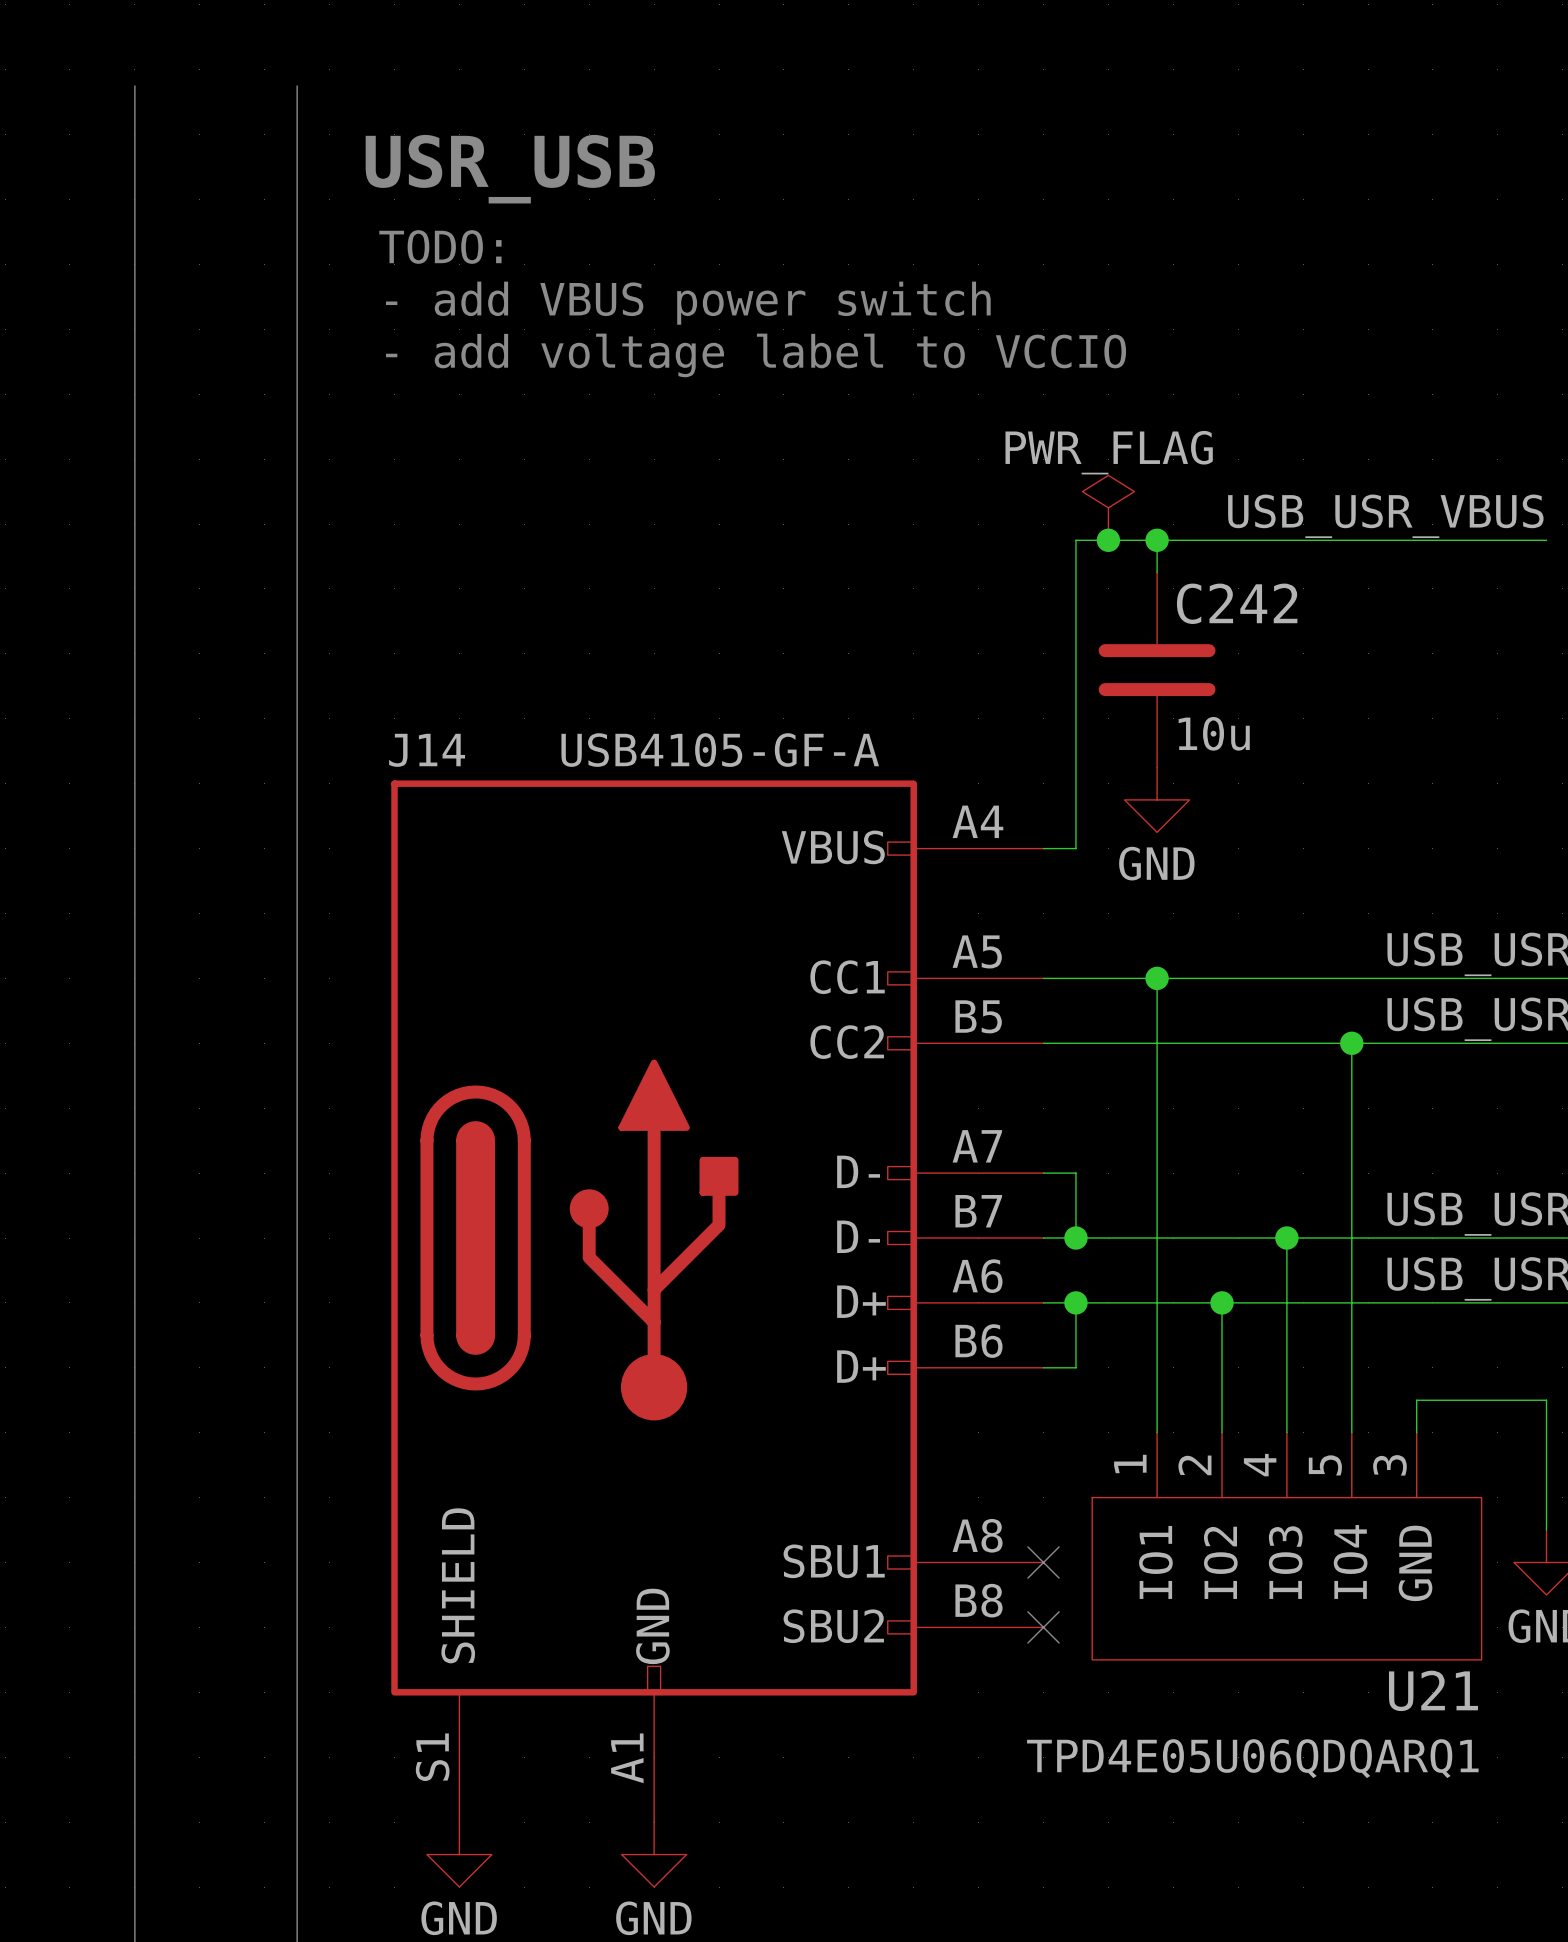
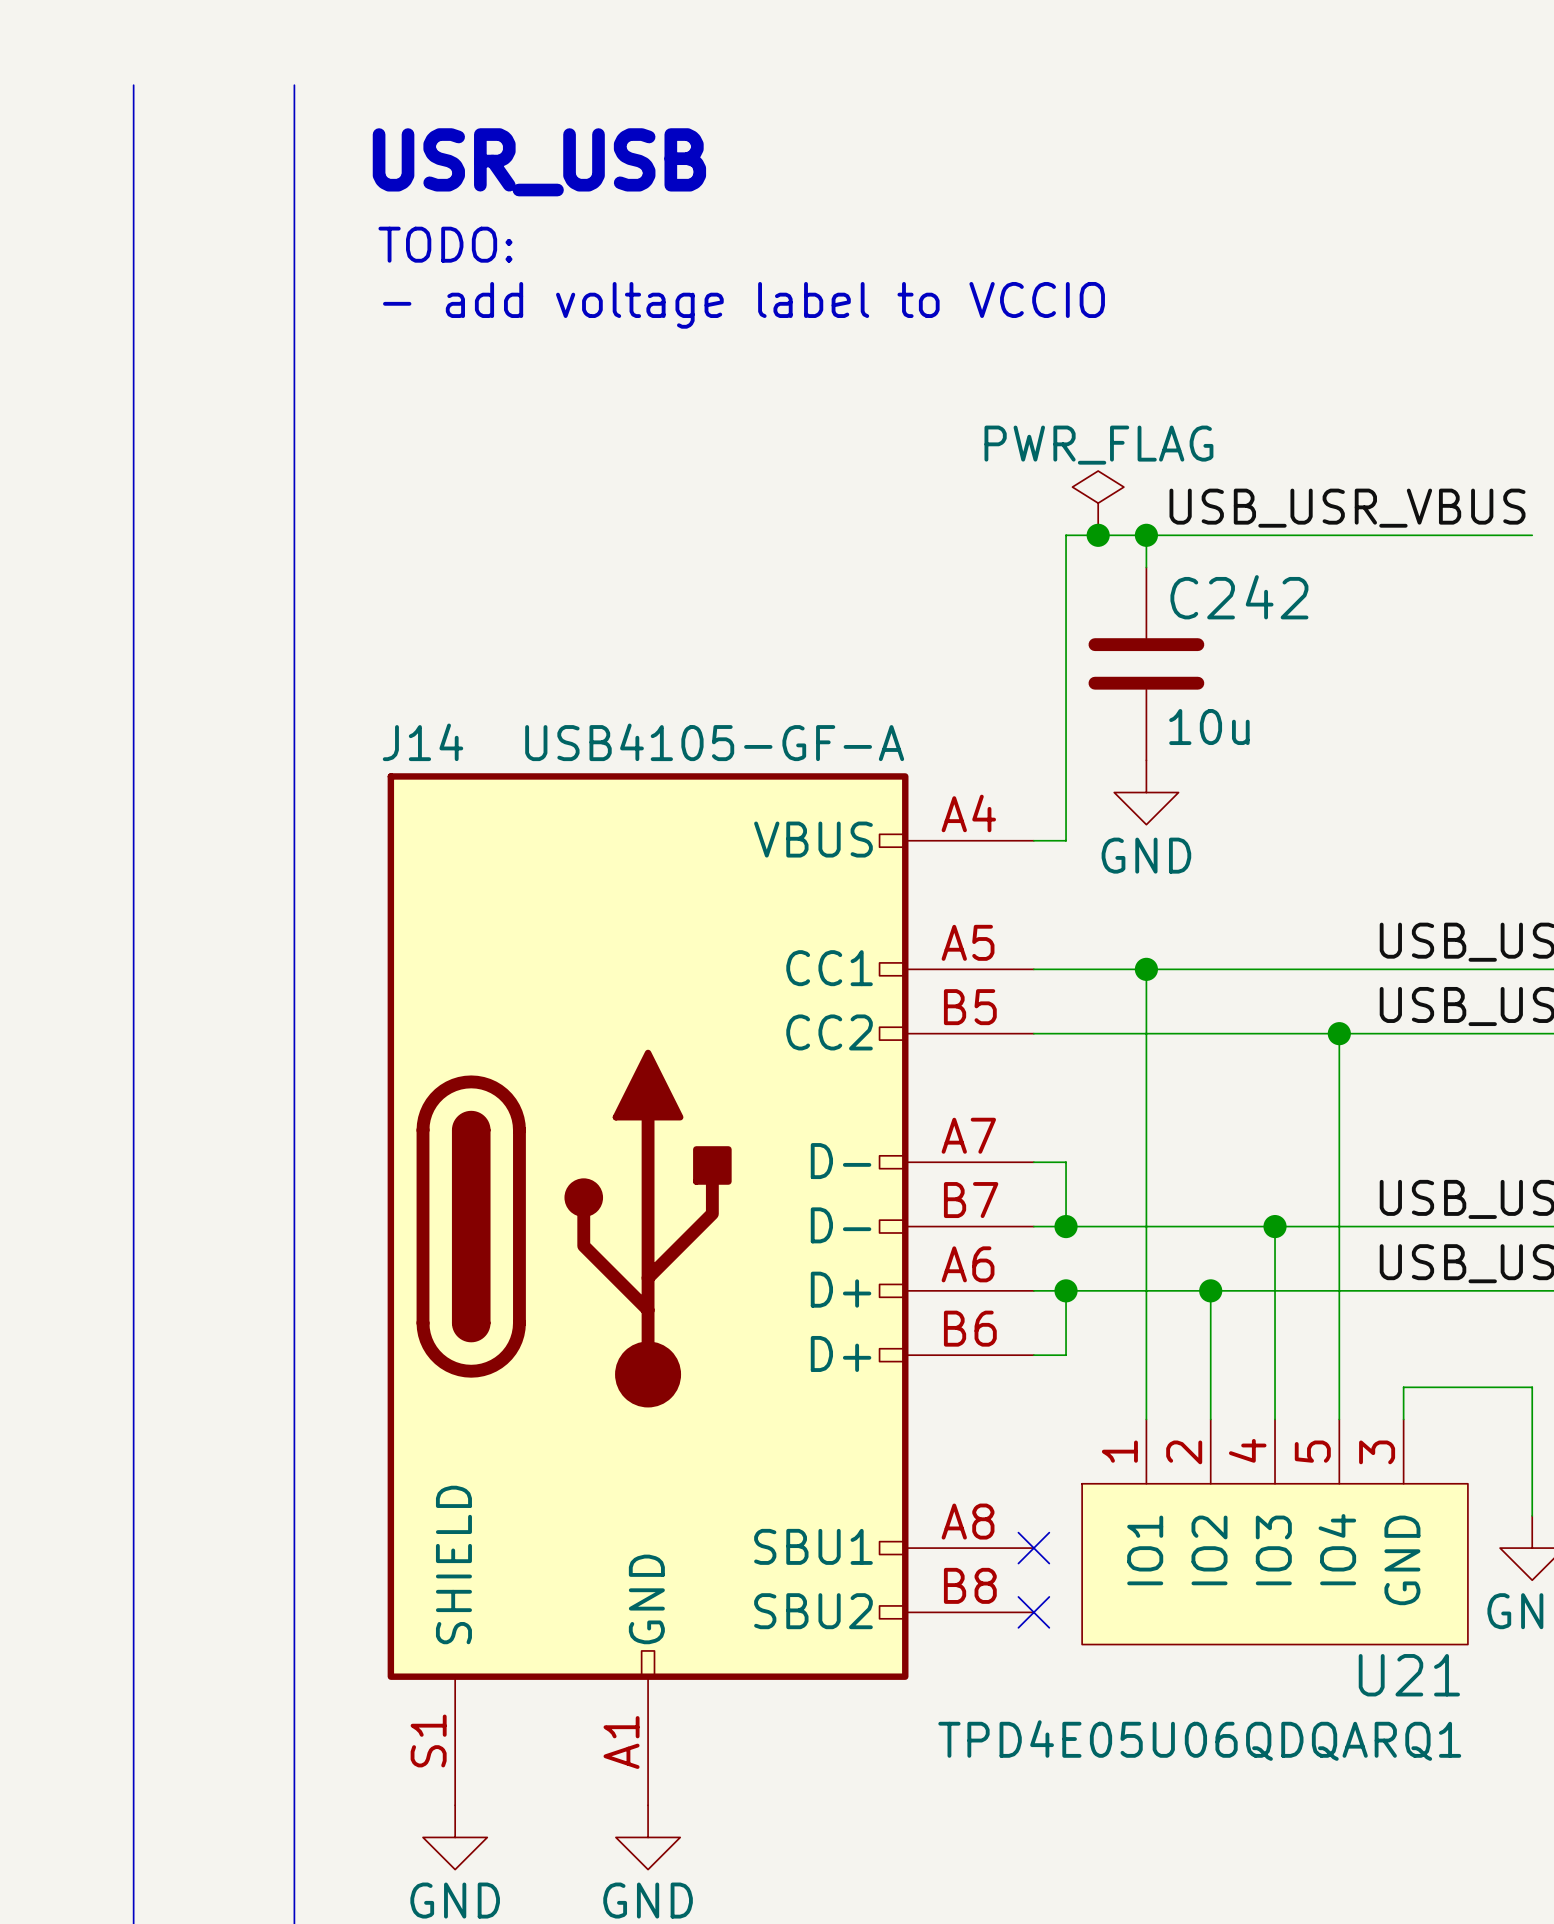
text: - add VBUS power switch (688, 303) -> none
text position: - add voltage label to VCCIO (756, 355) -> - add voltage label to VCCIO (743, 305)

